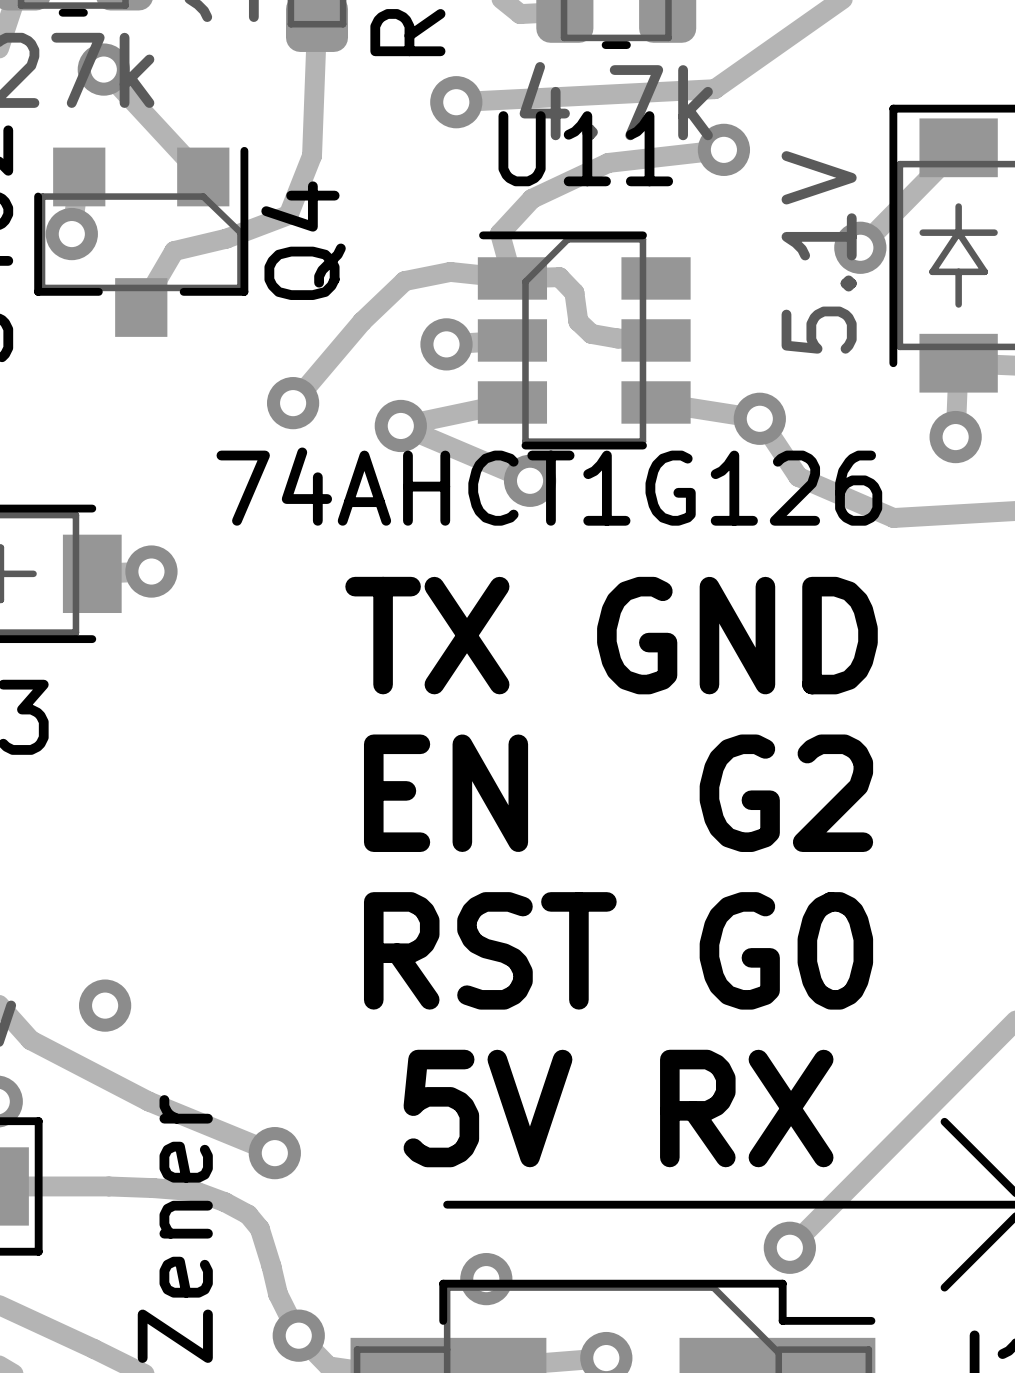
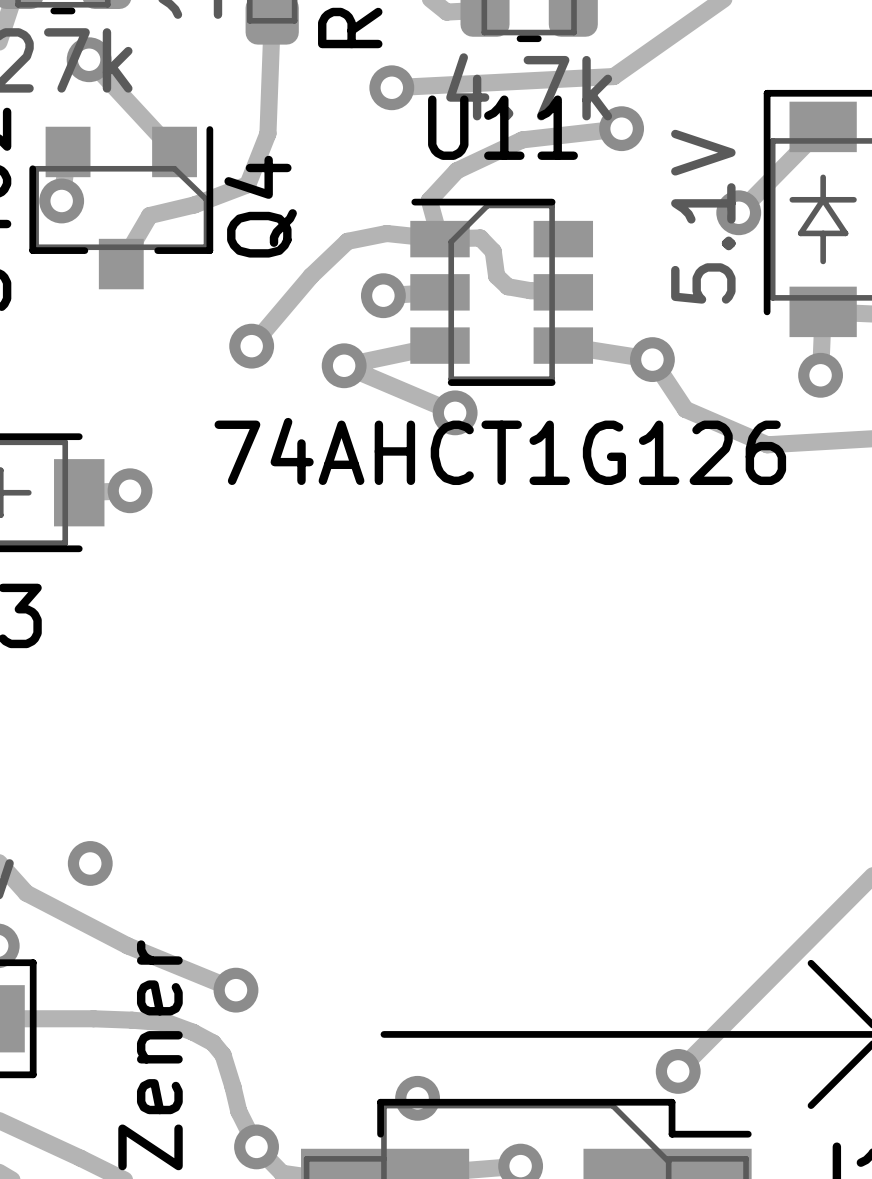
U11 value position: 74AHCT1G126 (549, 486) -> 74AHCT1G126 (500, 451)
text: TX GND (611, 635) -> none
text: EN G2 (618, 793) -> none
text: RST G0 (618, 950) -> none
text: 5V RX (618, 1108) -> none

